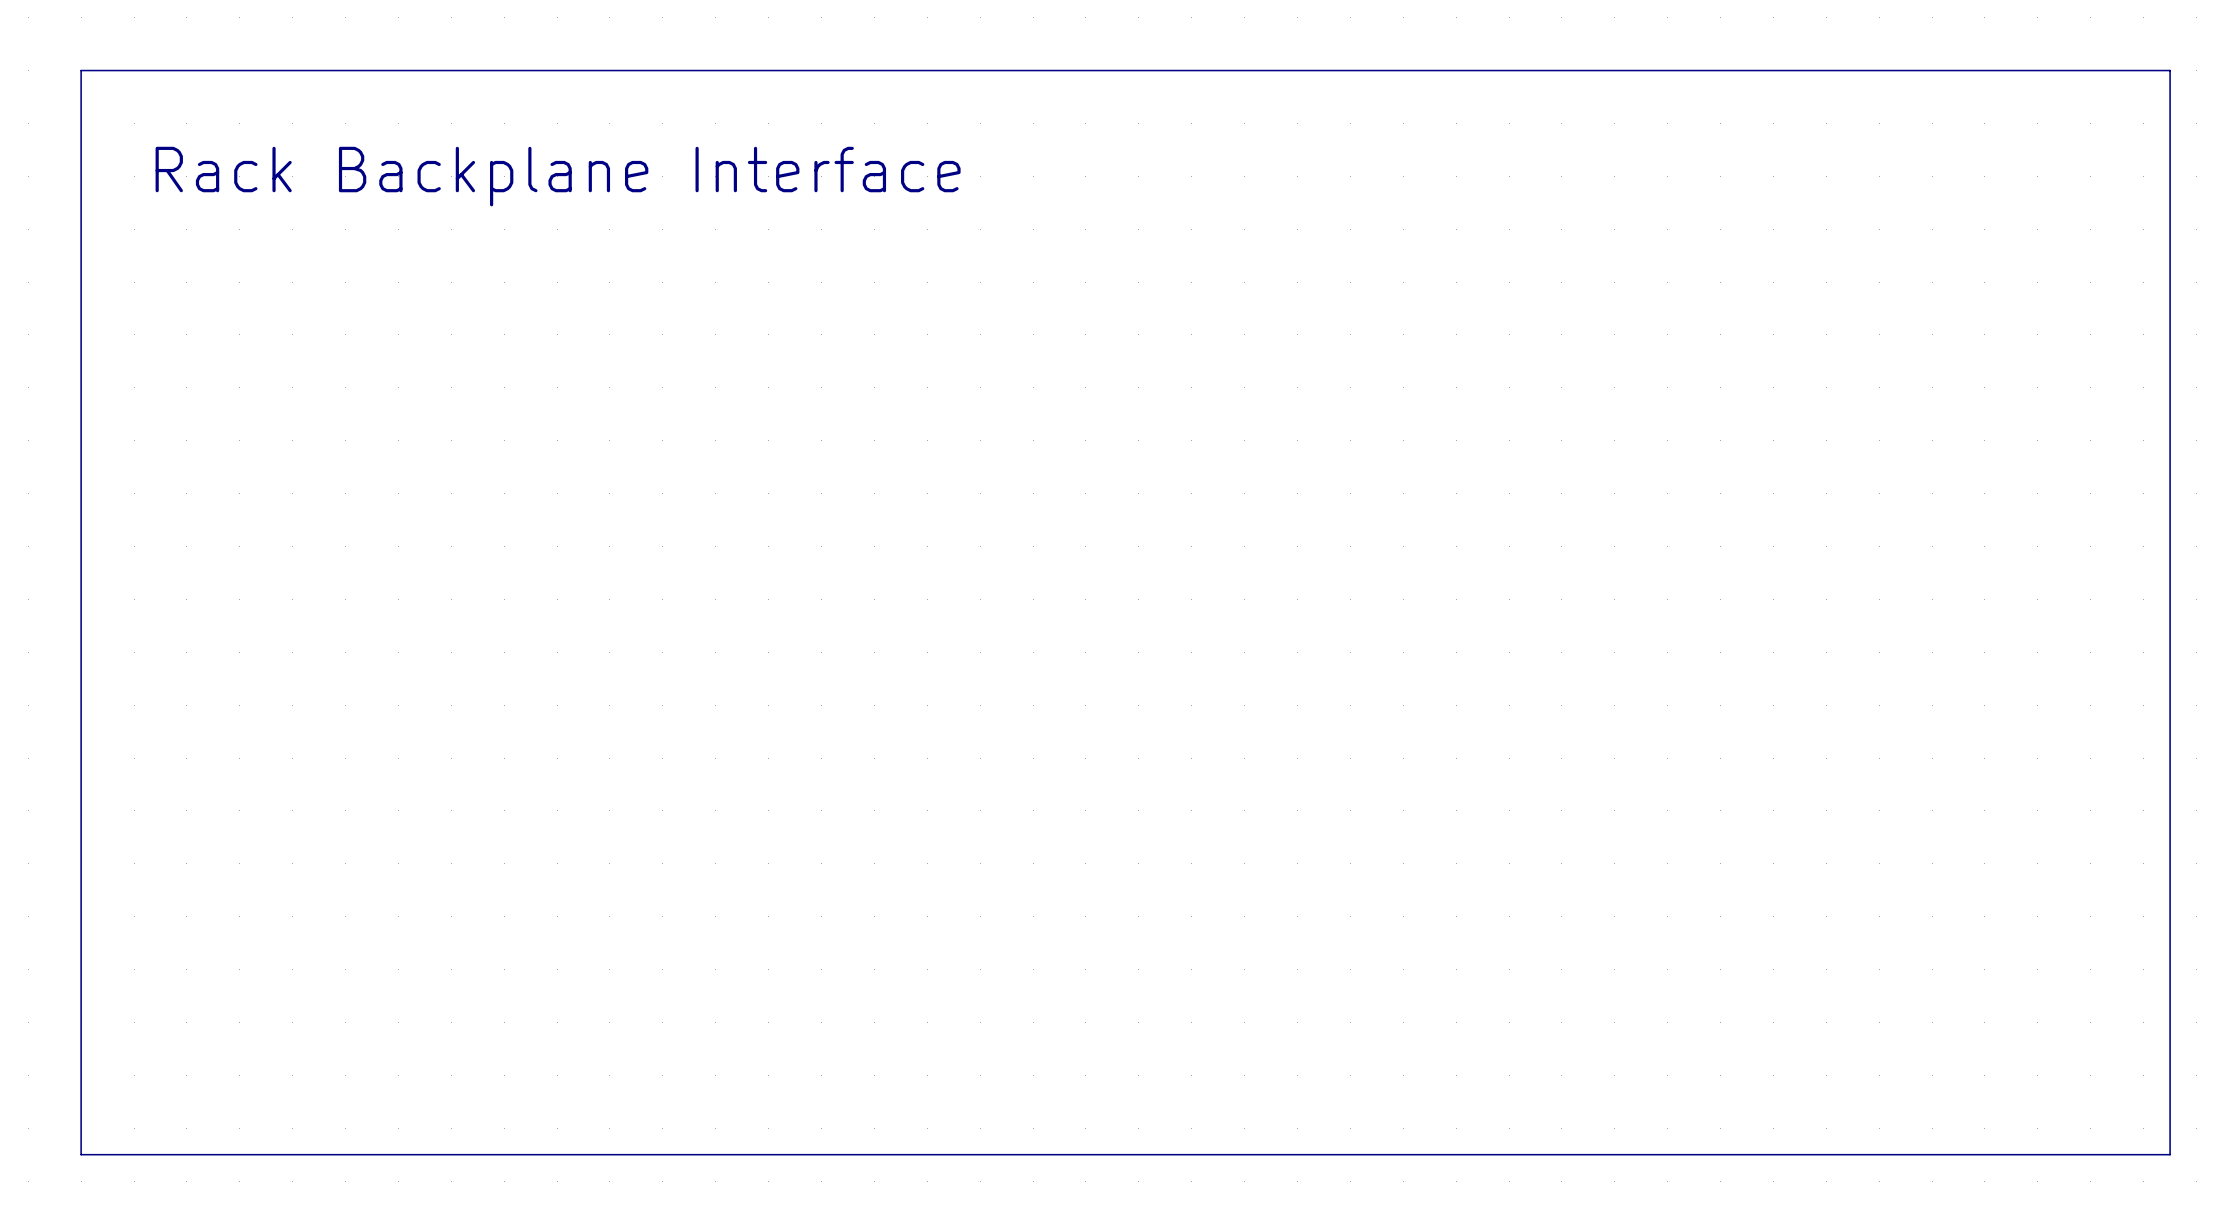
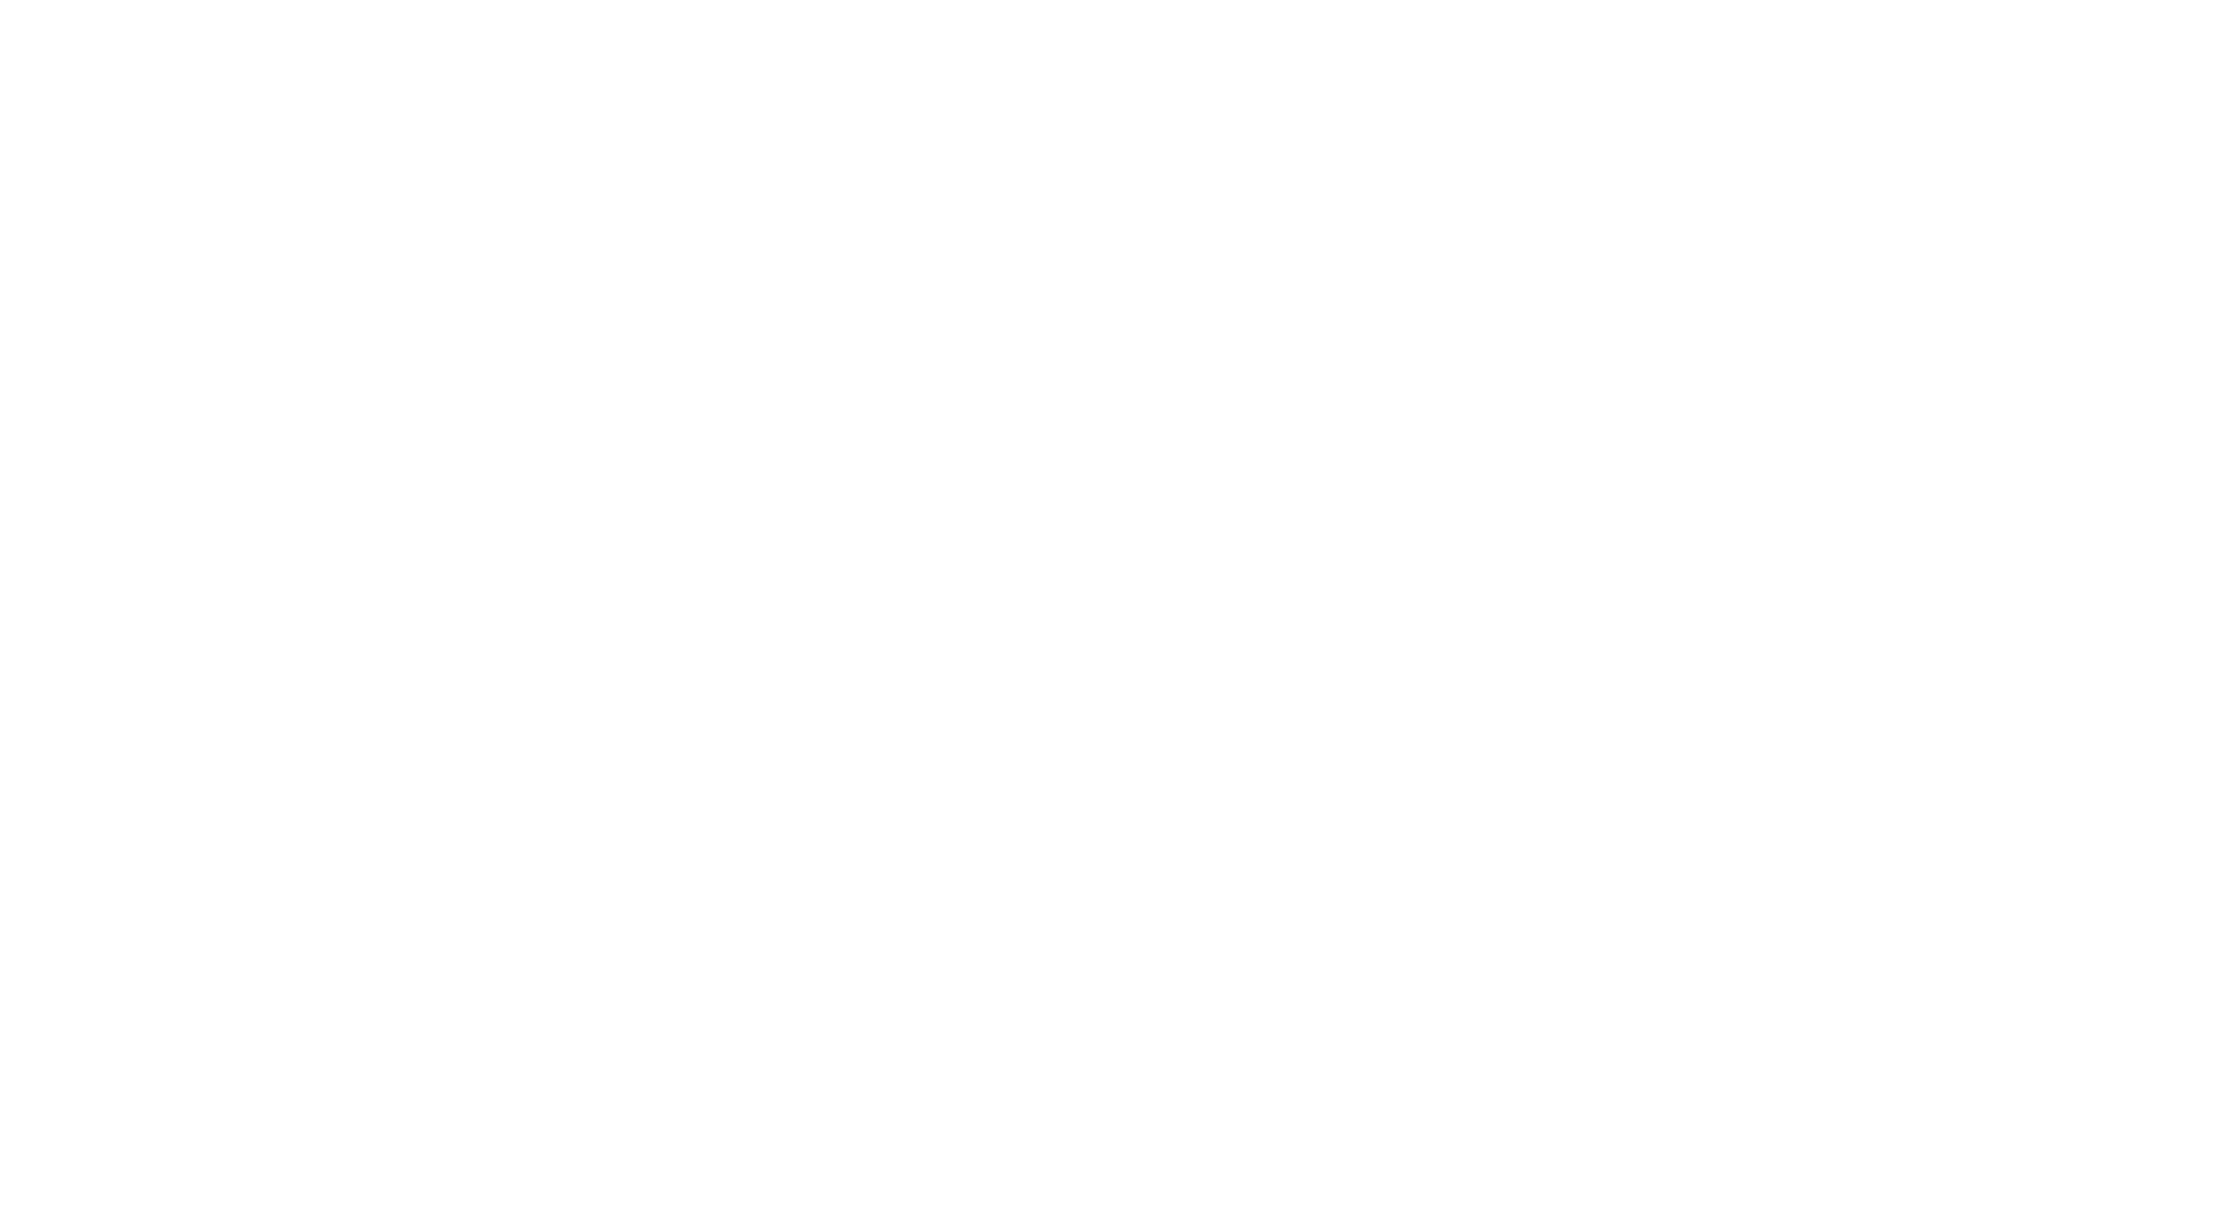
line: (81, 70) (2170, 70) (2170, 1154) (81, 1154) (81, 70) -> none
text: Rack Backplane Interface (558, 176) -> none

